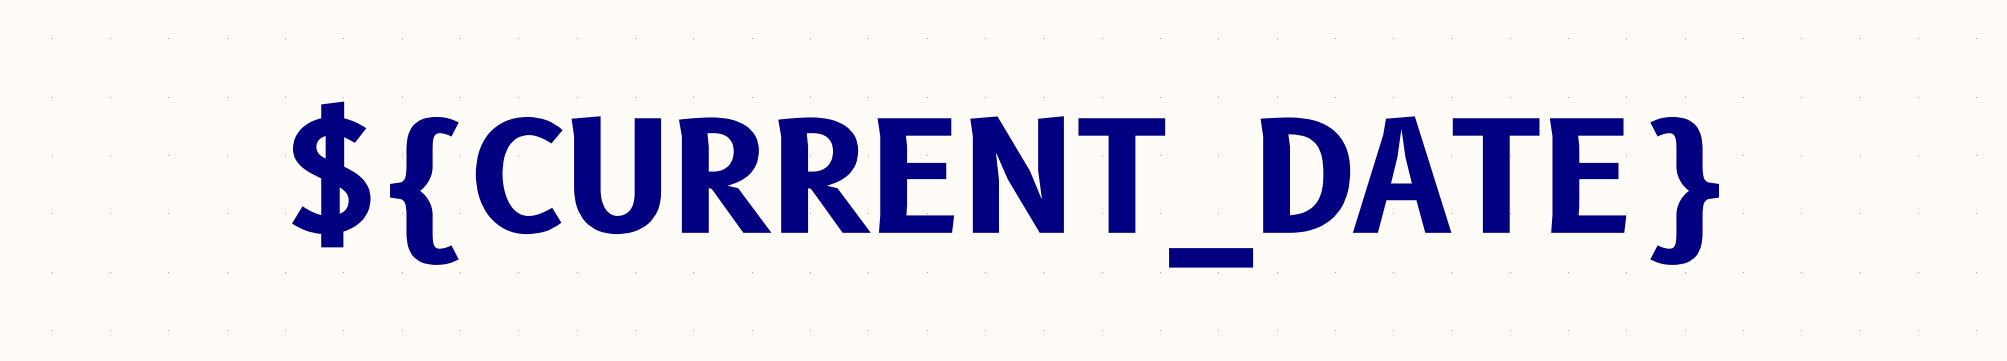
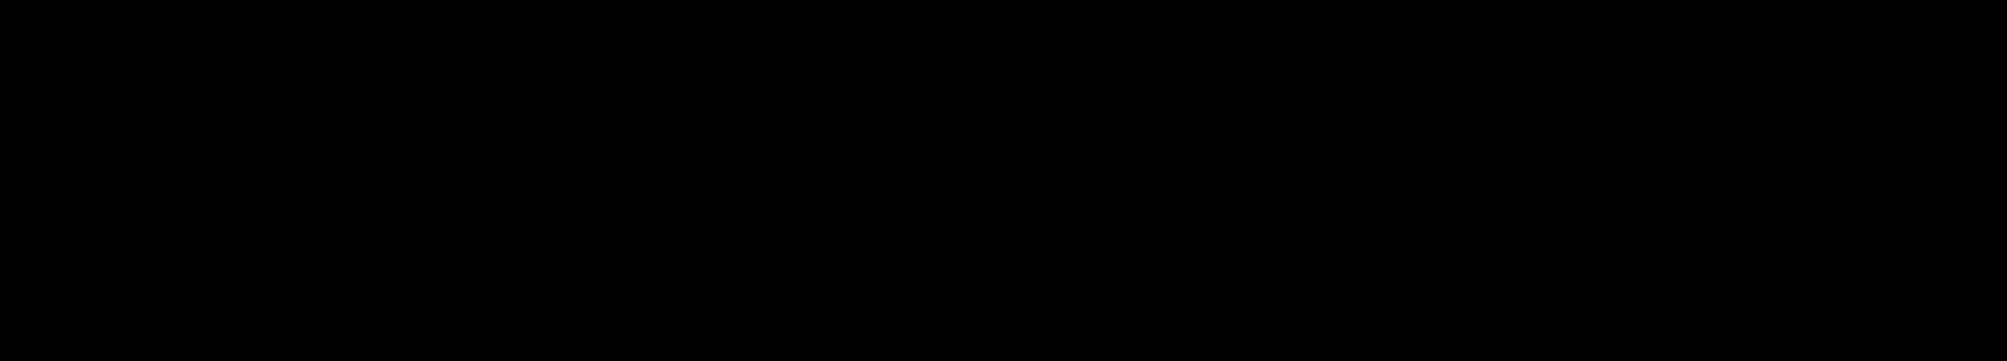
text: ${CURRENT_DATE} (1005, 184) -> none

